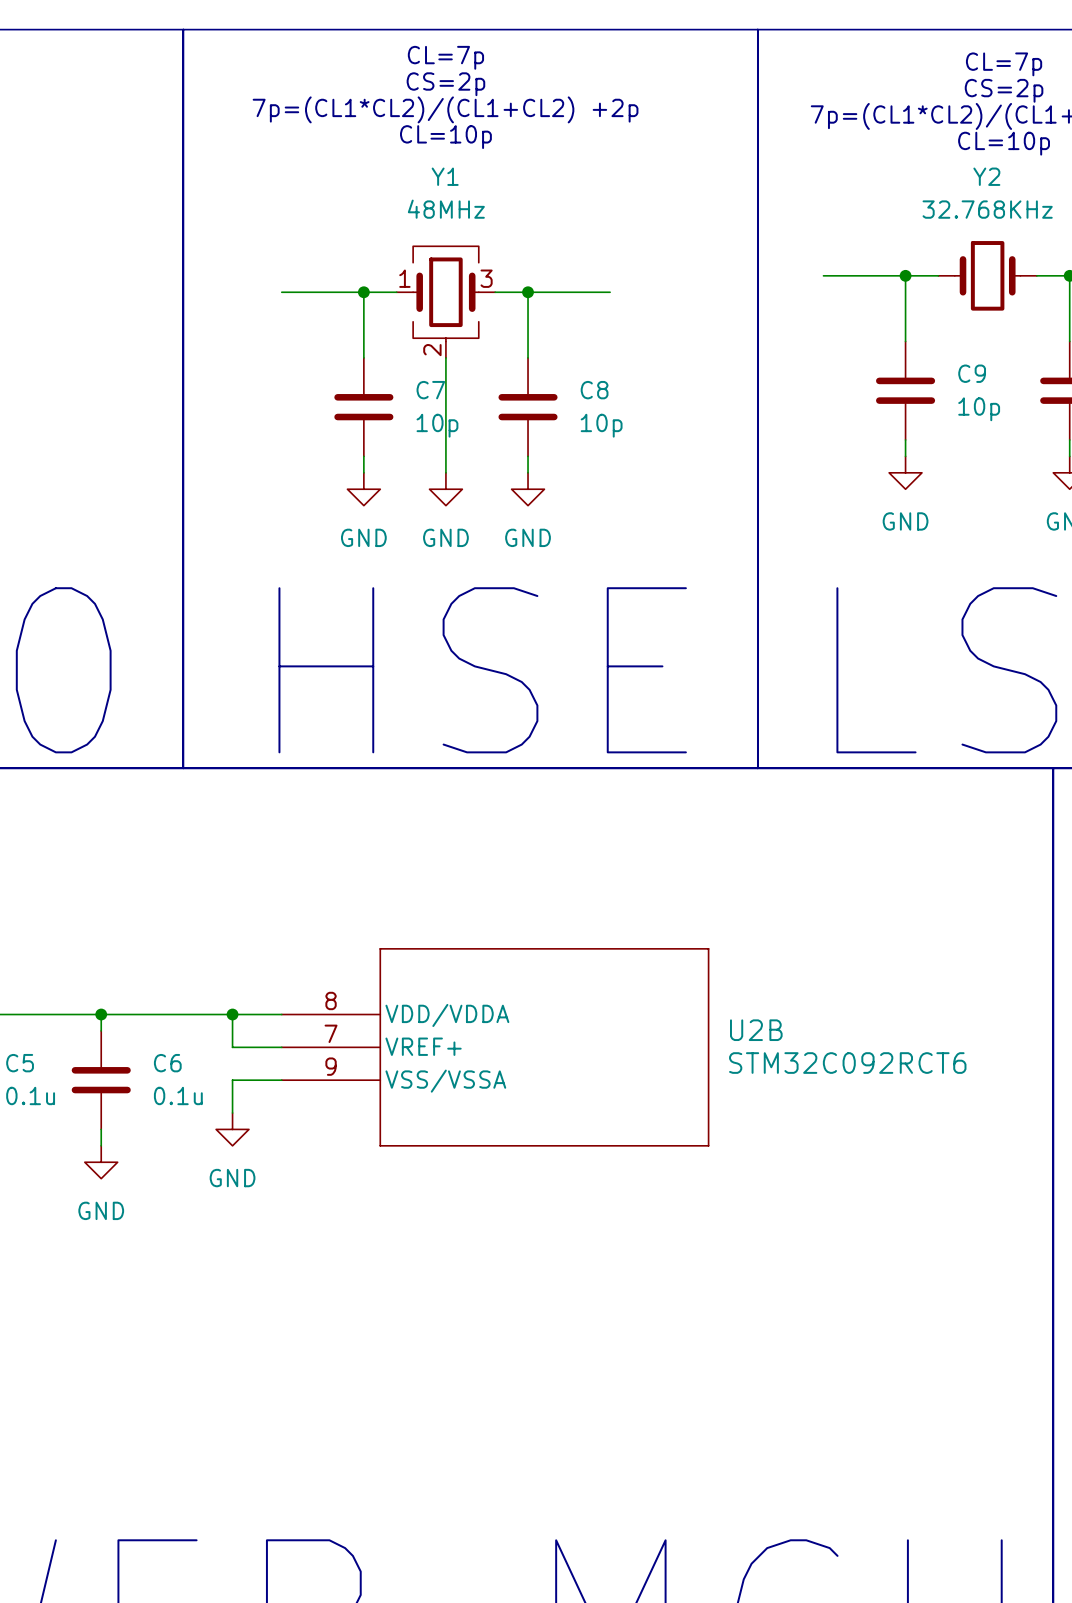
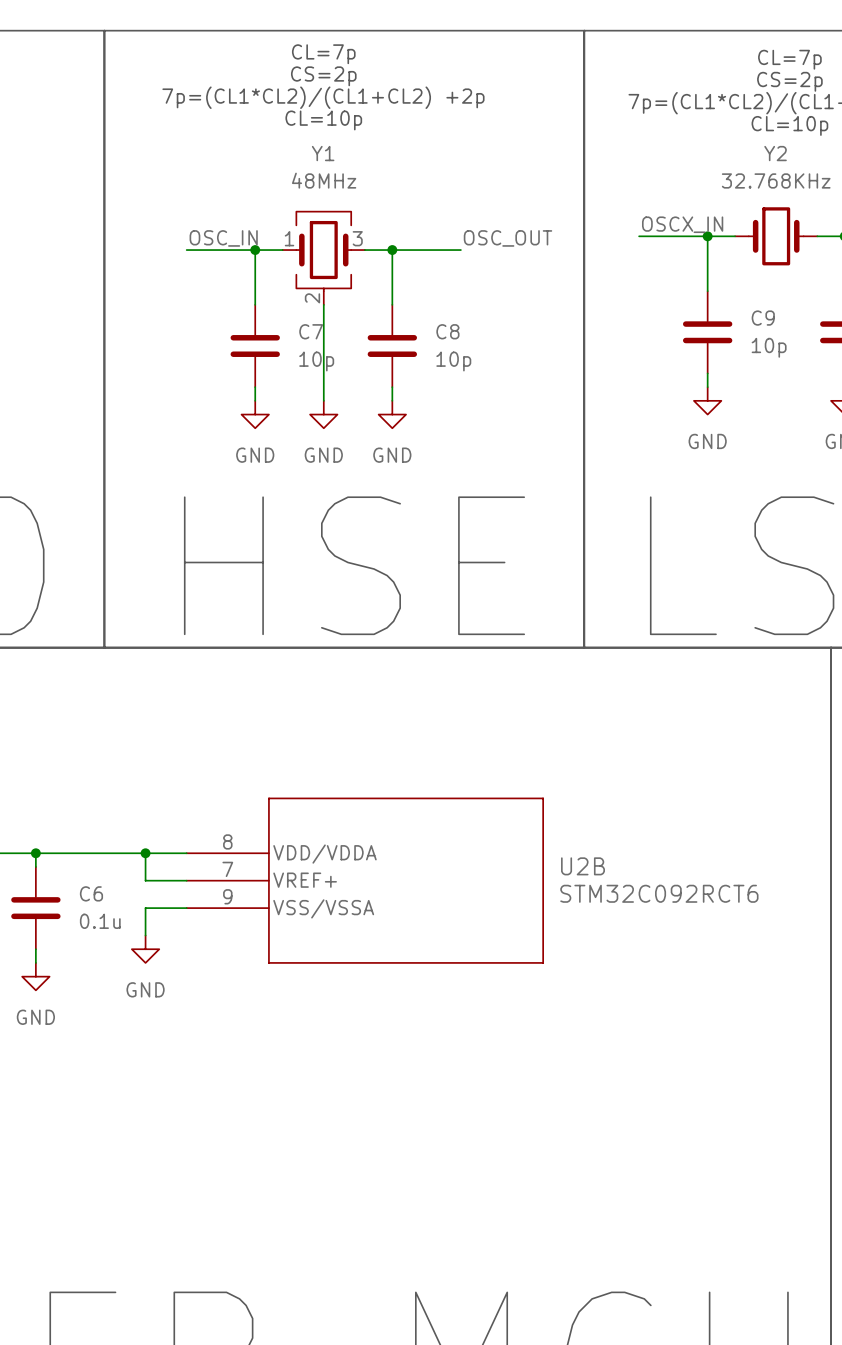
label: none -> OSCX_IN (682, 224)
label: none -> OSC_IN (223, 238)
label: none -> OSC_OUT (507, 238)

